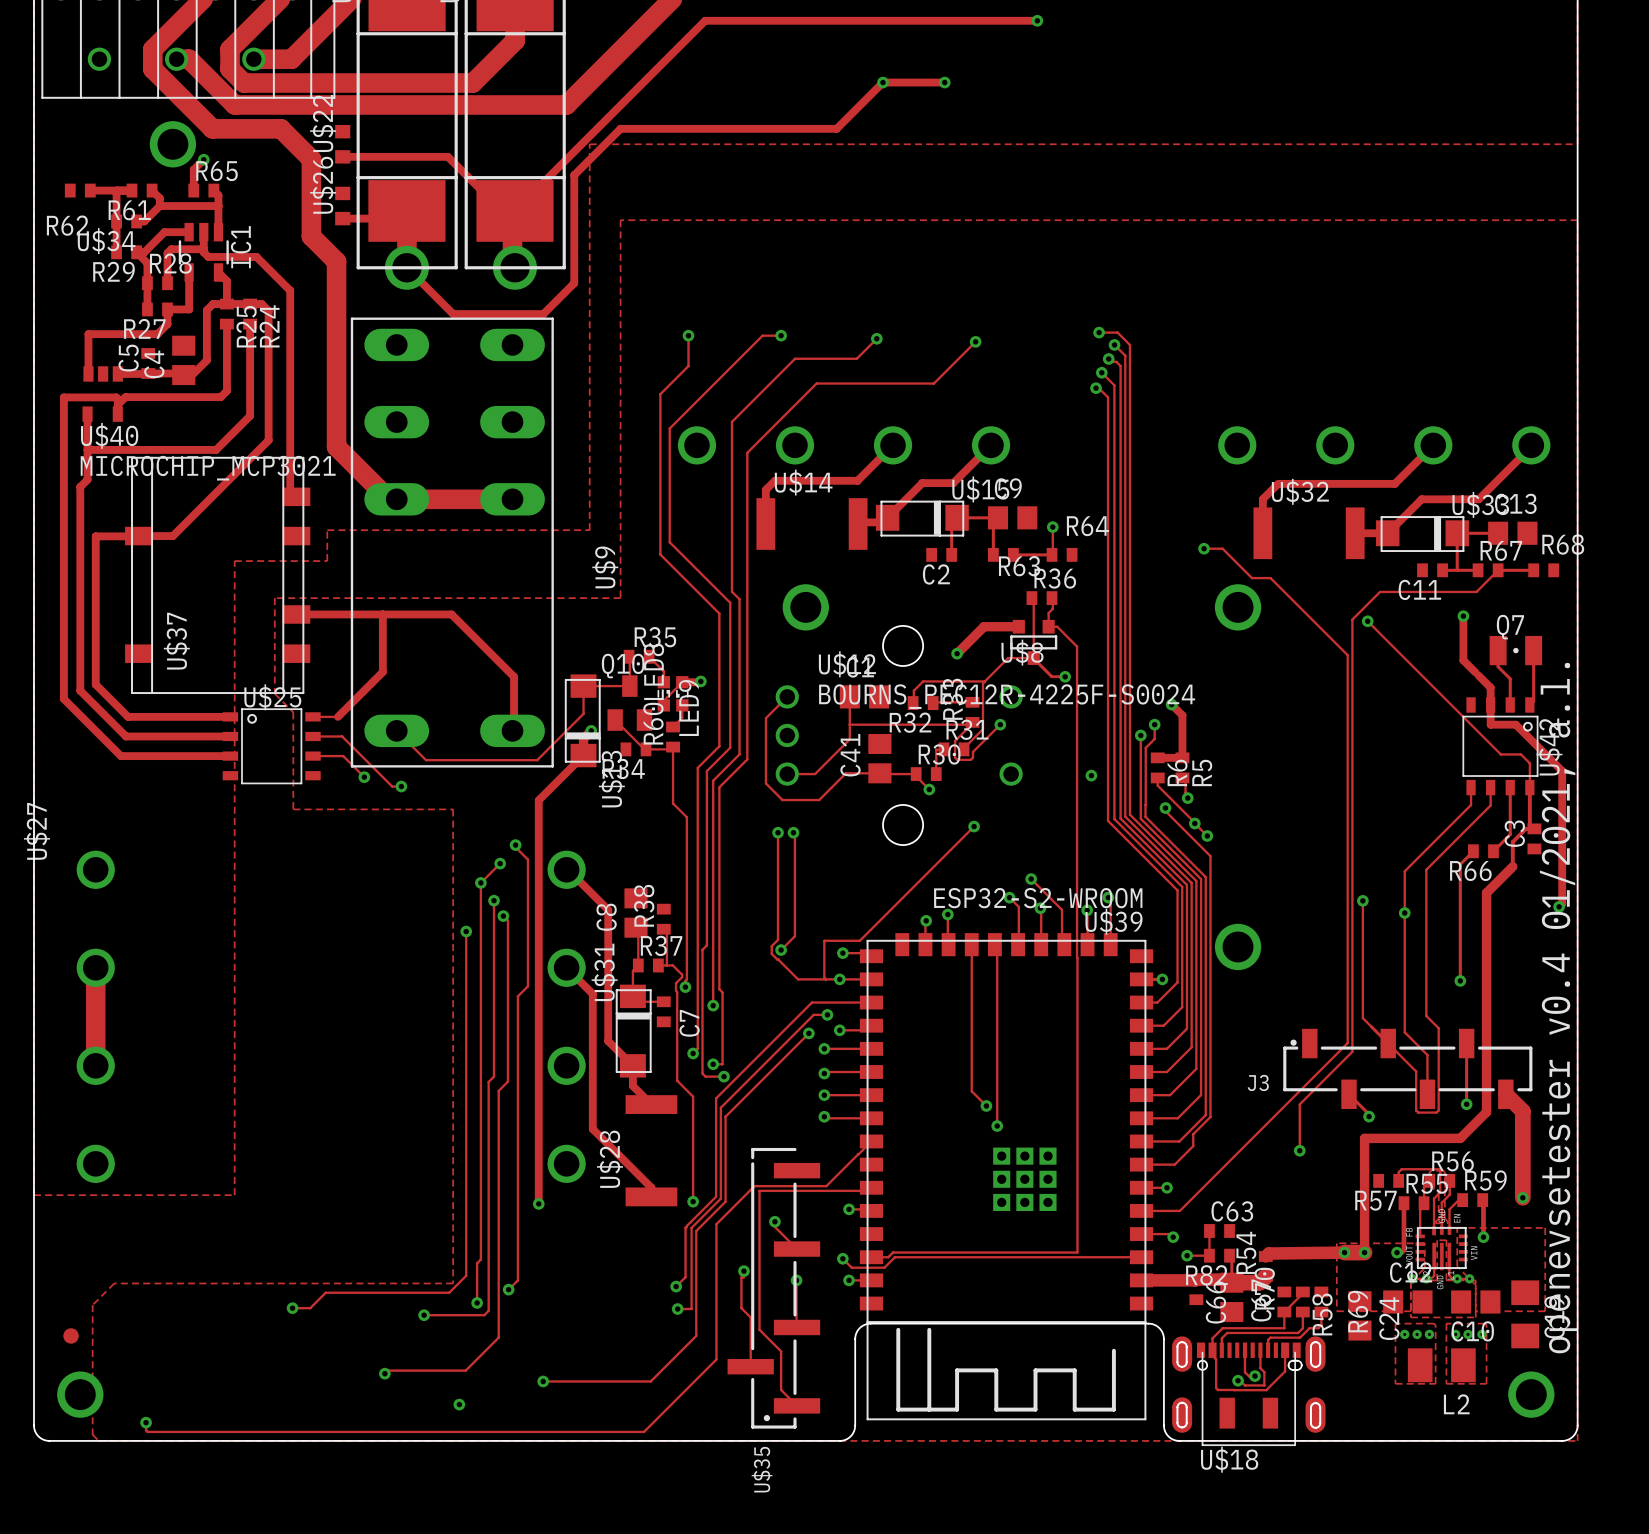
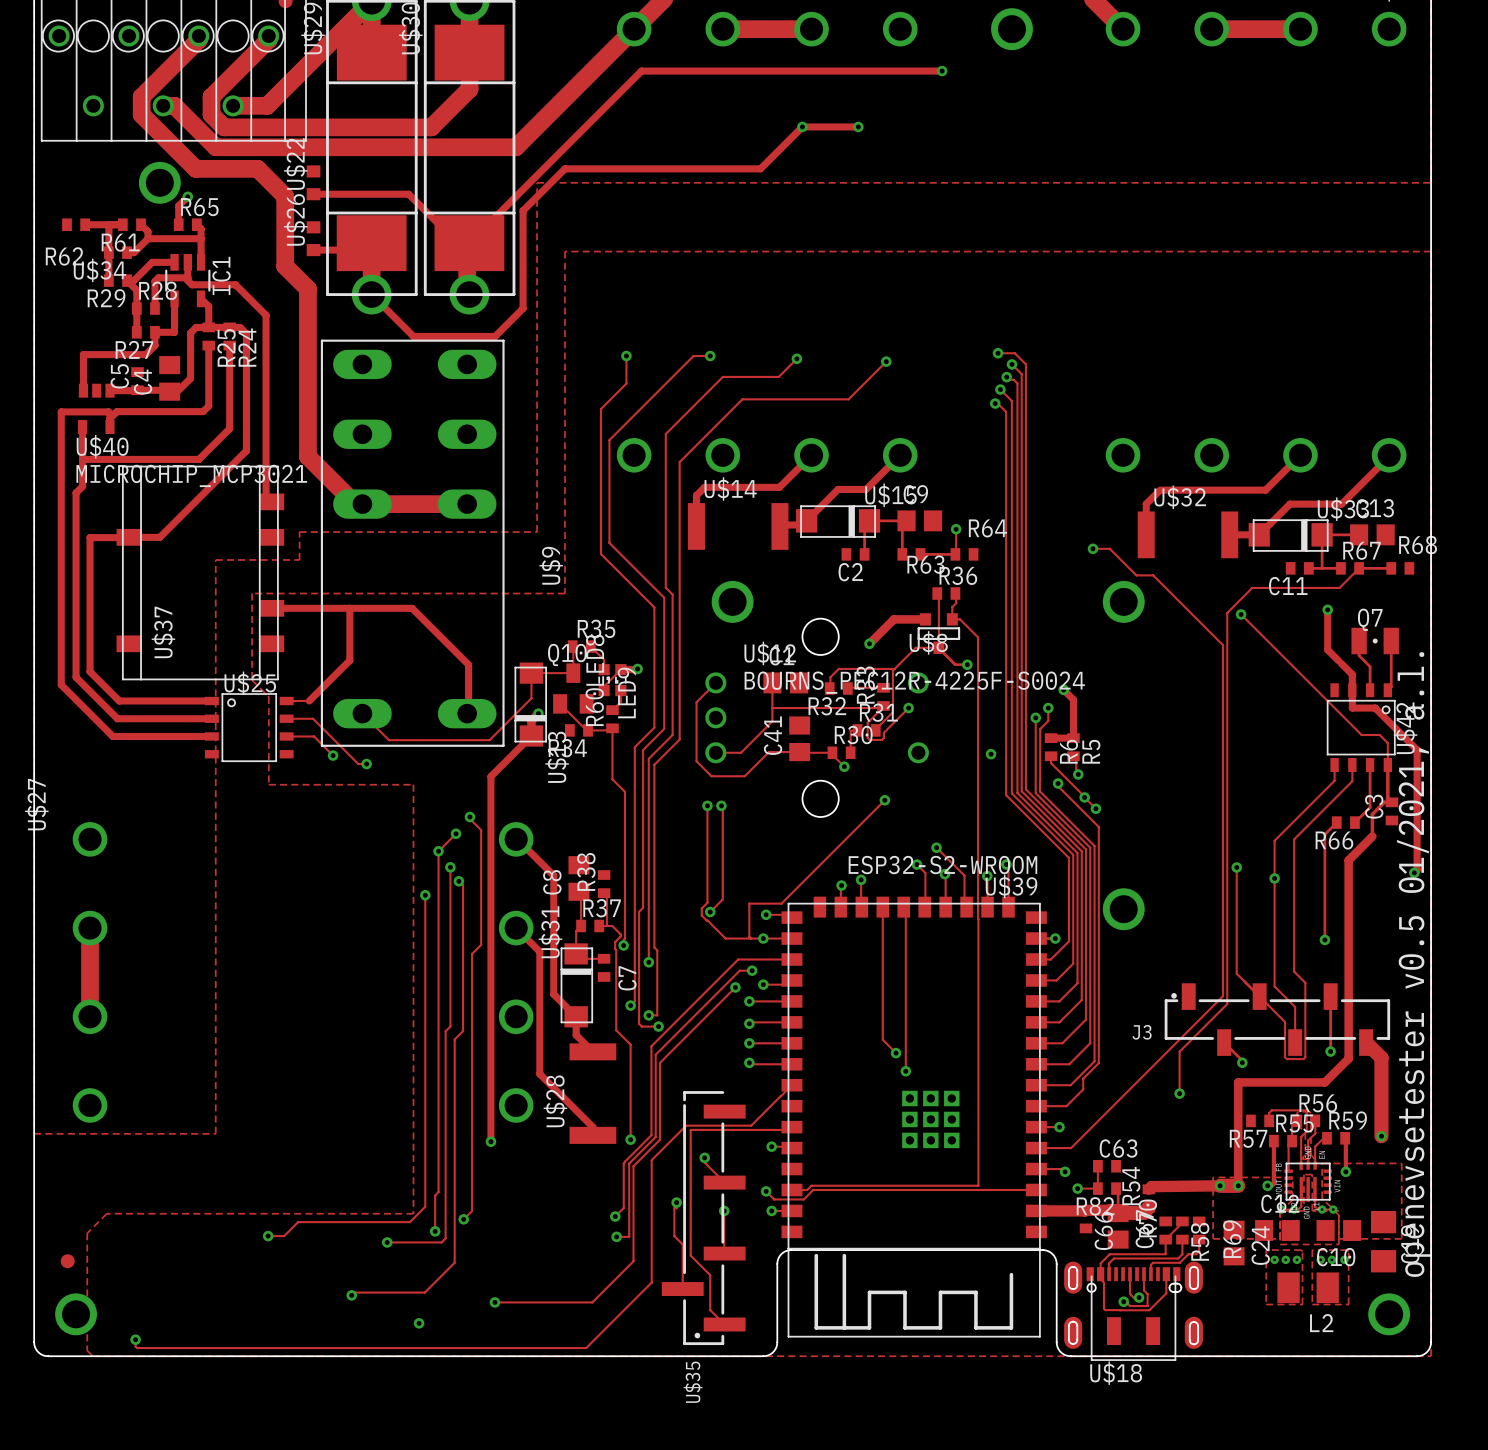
text: openevsetester v0.4 01/2021, a.l. (1558, 1008) -> openevsetester v0.5 01/2021, a.l. (1414, 964)

